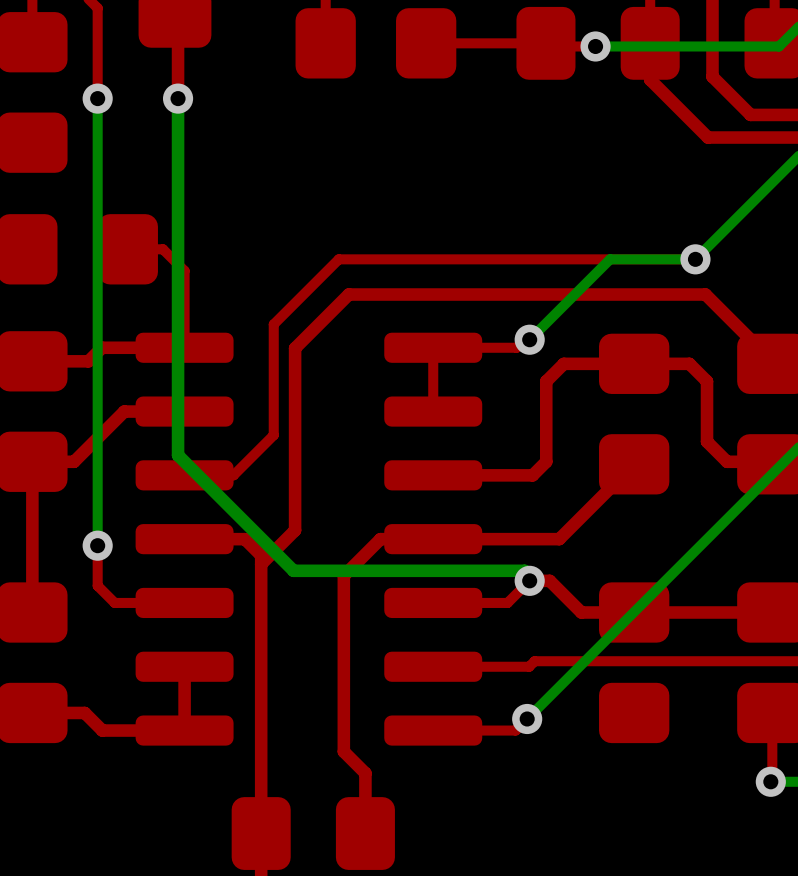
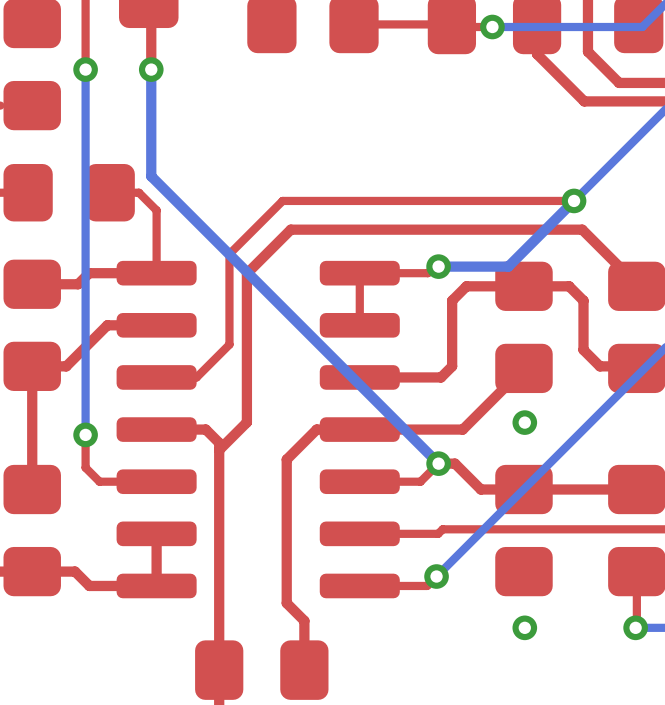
bottom track: (178, 229) (178, 455) (293, 570) (524, 570) (534, 580) -> (151, 176) (438, 463)
bottom track: (695, 259) (610, 259) (529, 339) -> (574, 200) (508, 266) (438, 266)
via: none -> (524, 422)
via: none -> (524, 627)

